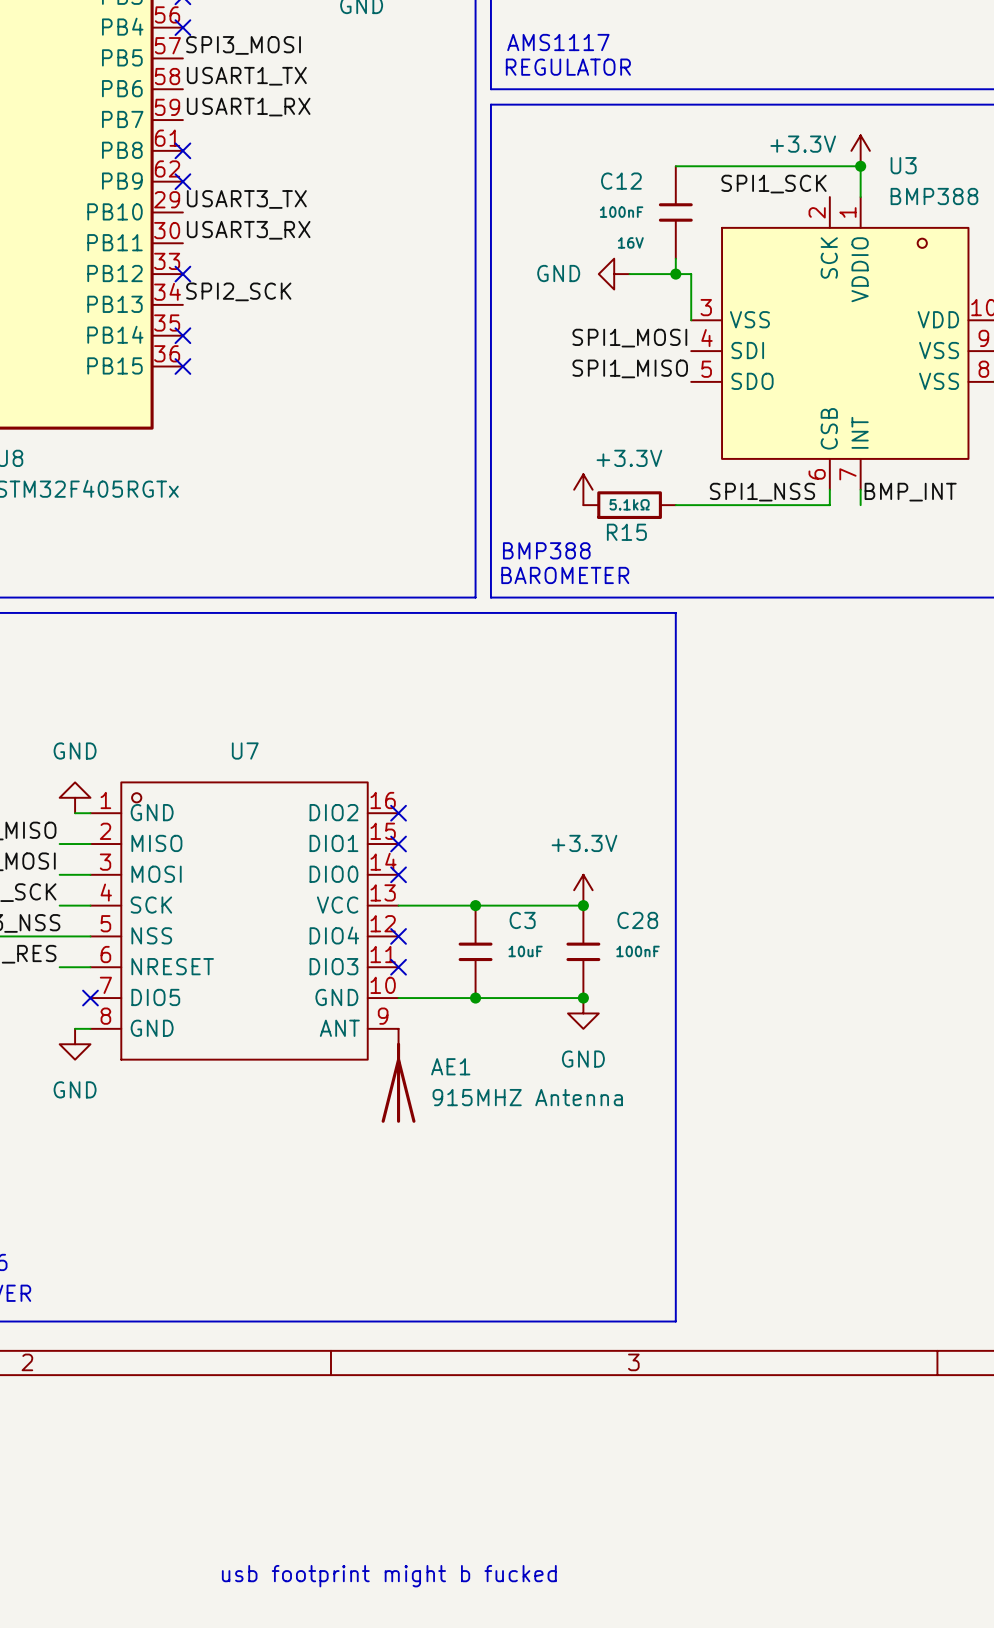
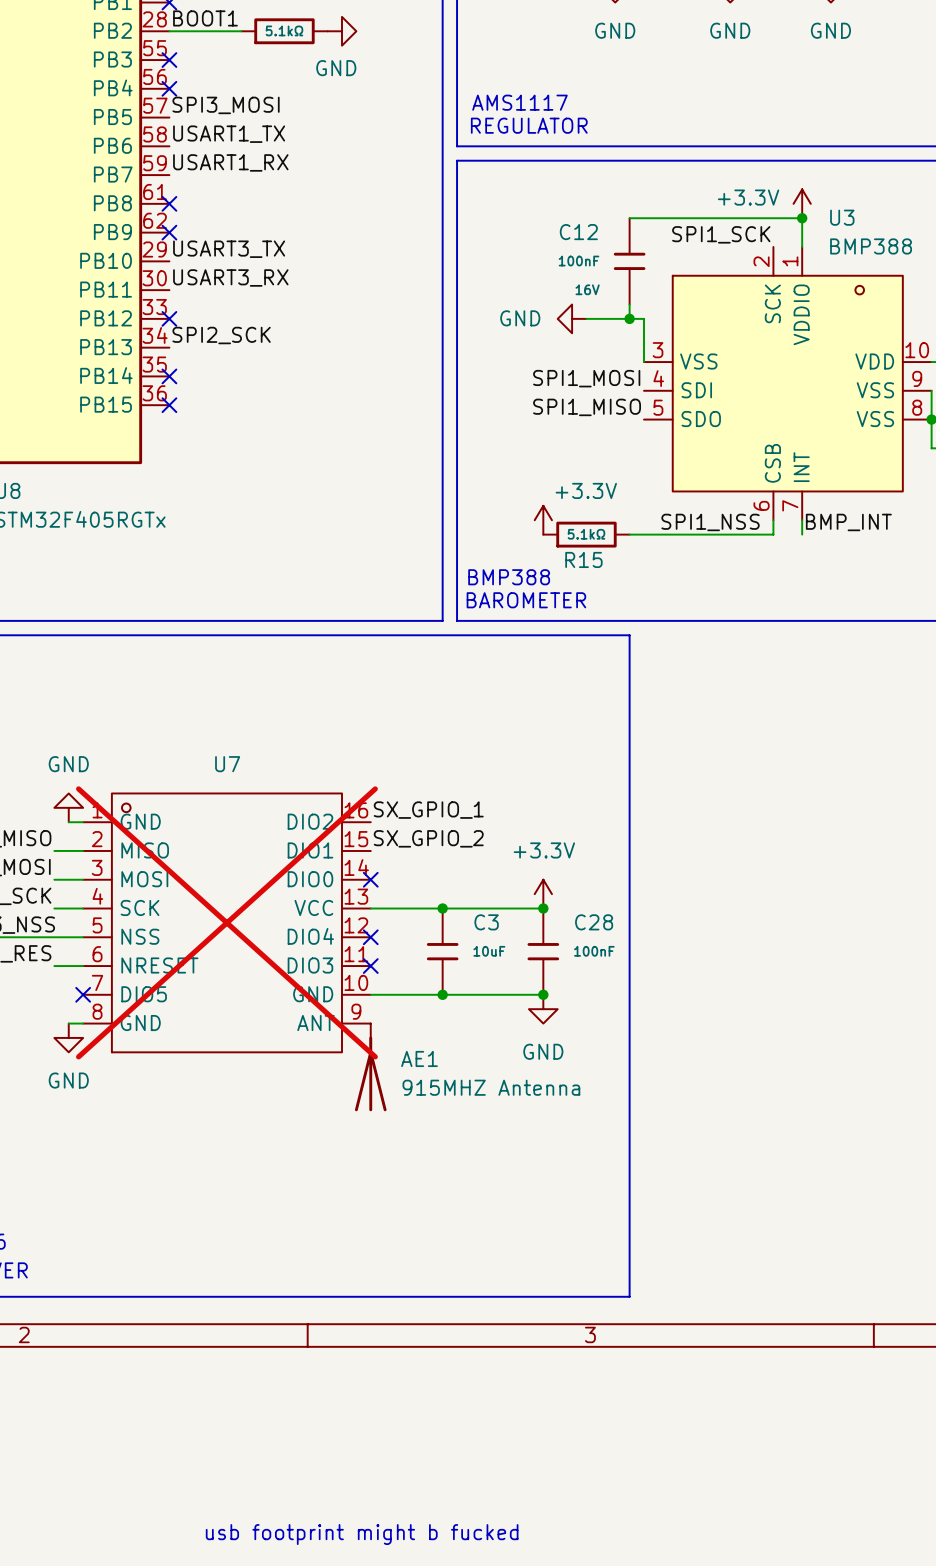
label: none -> SX_GPIO_1 (428, 810)
no-connect mark: (398, 813) -> none
label: none -> SX_GPIO_2 (428, 838)
no-connect mark: (398, 844) -> none
U7 do-not-place cross: none -> (226, 922)

